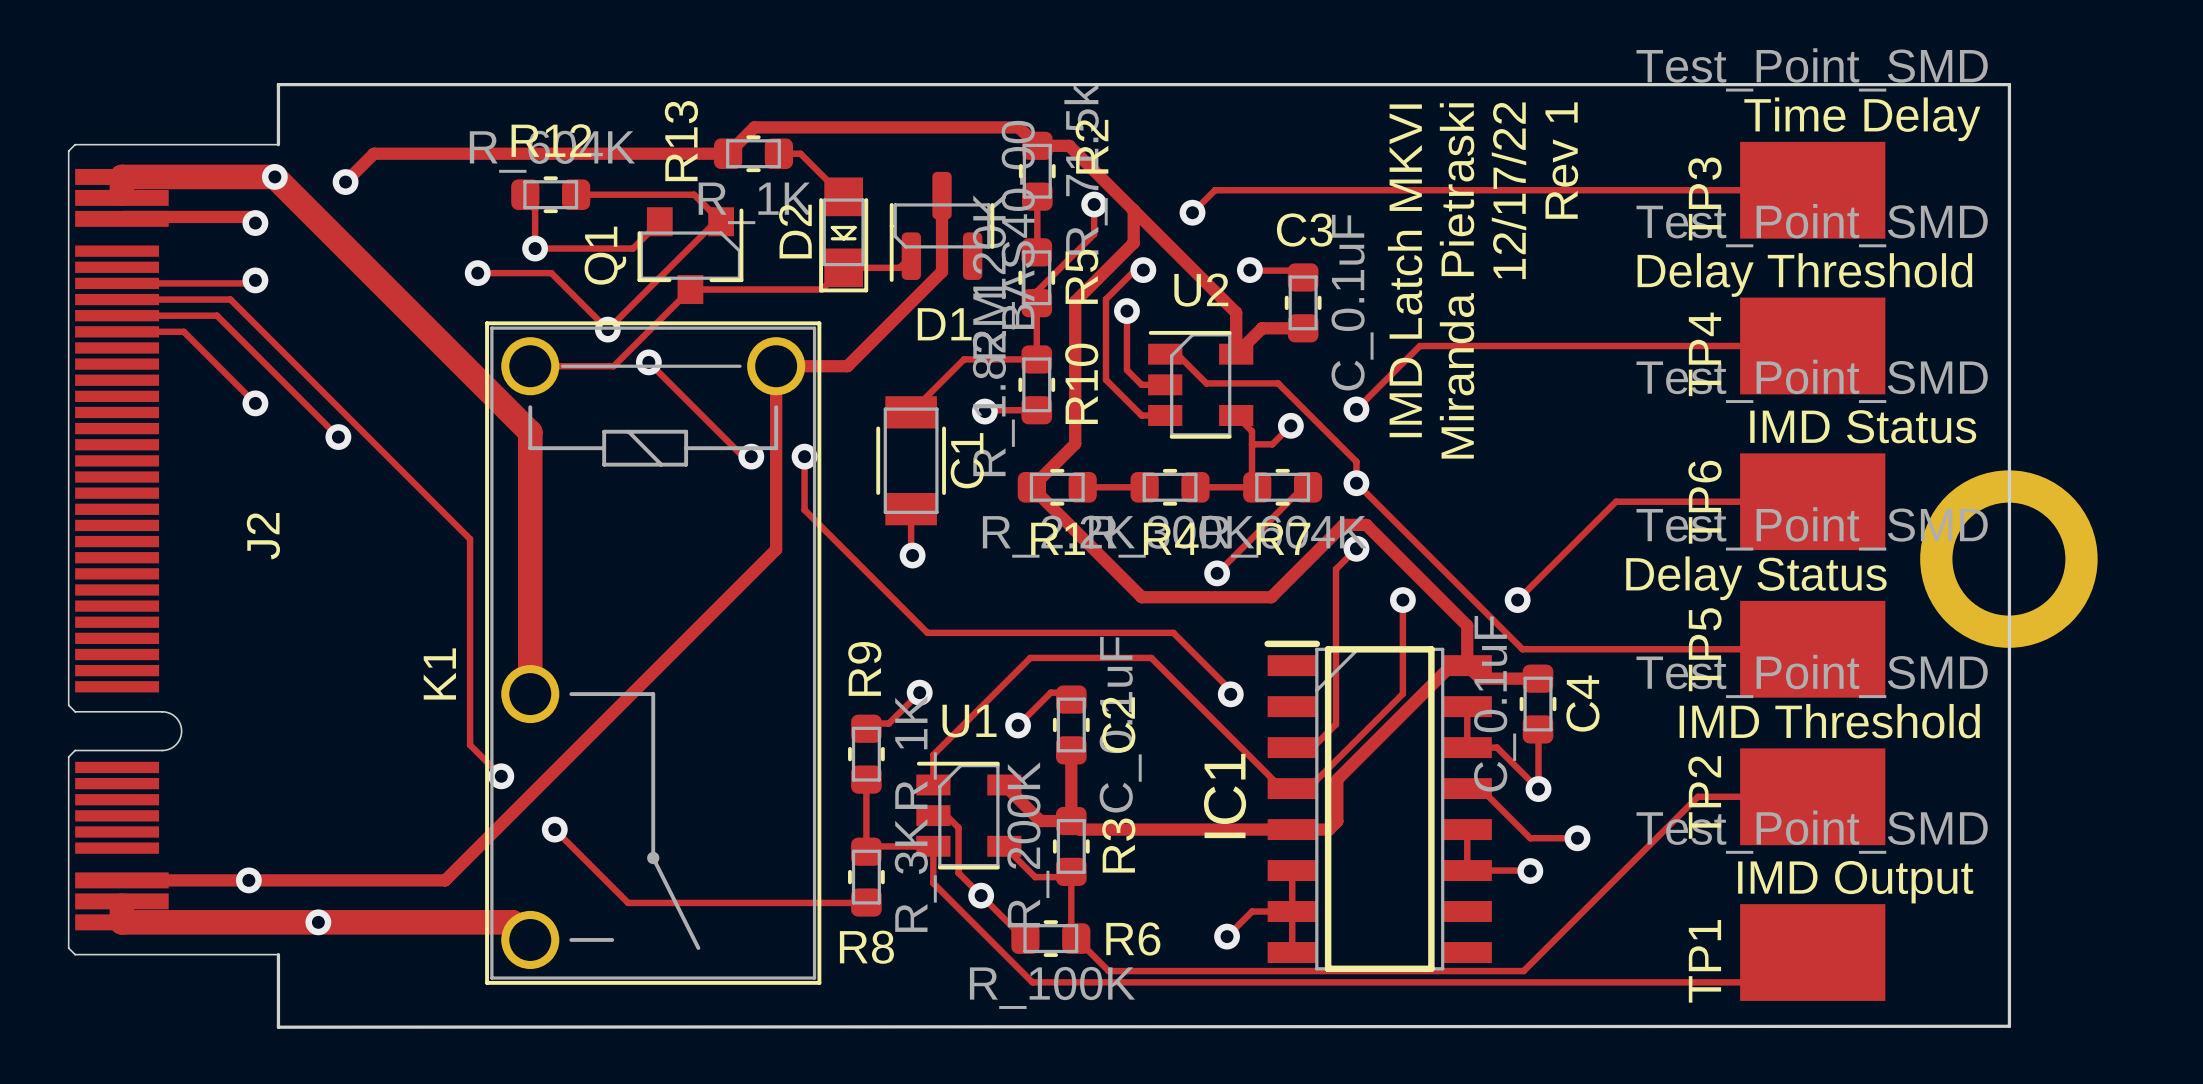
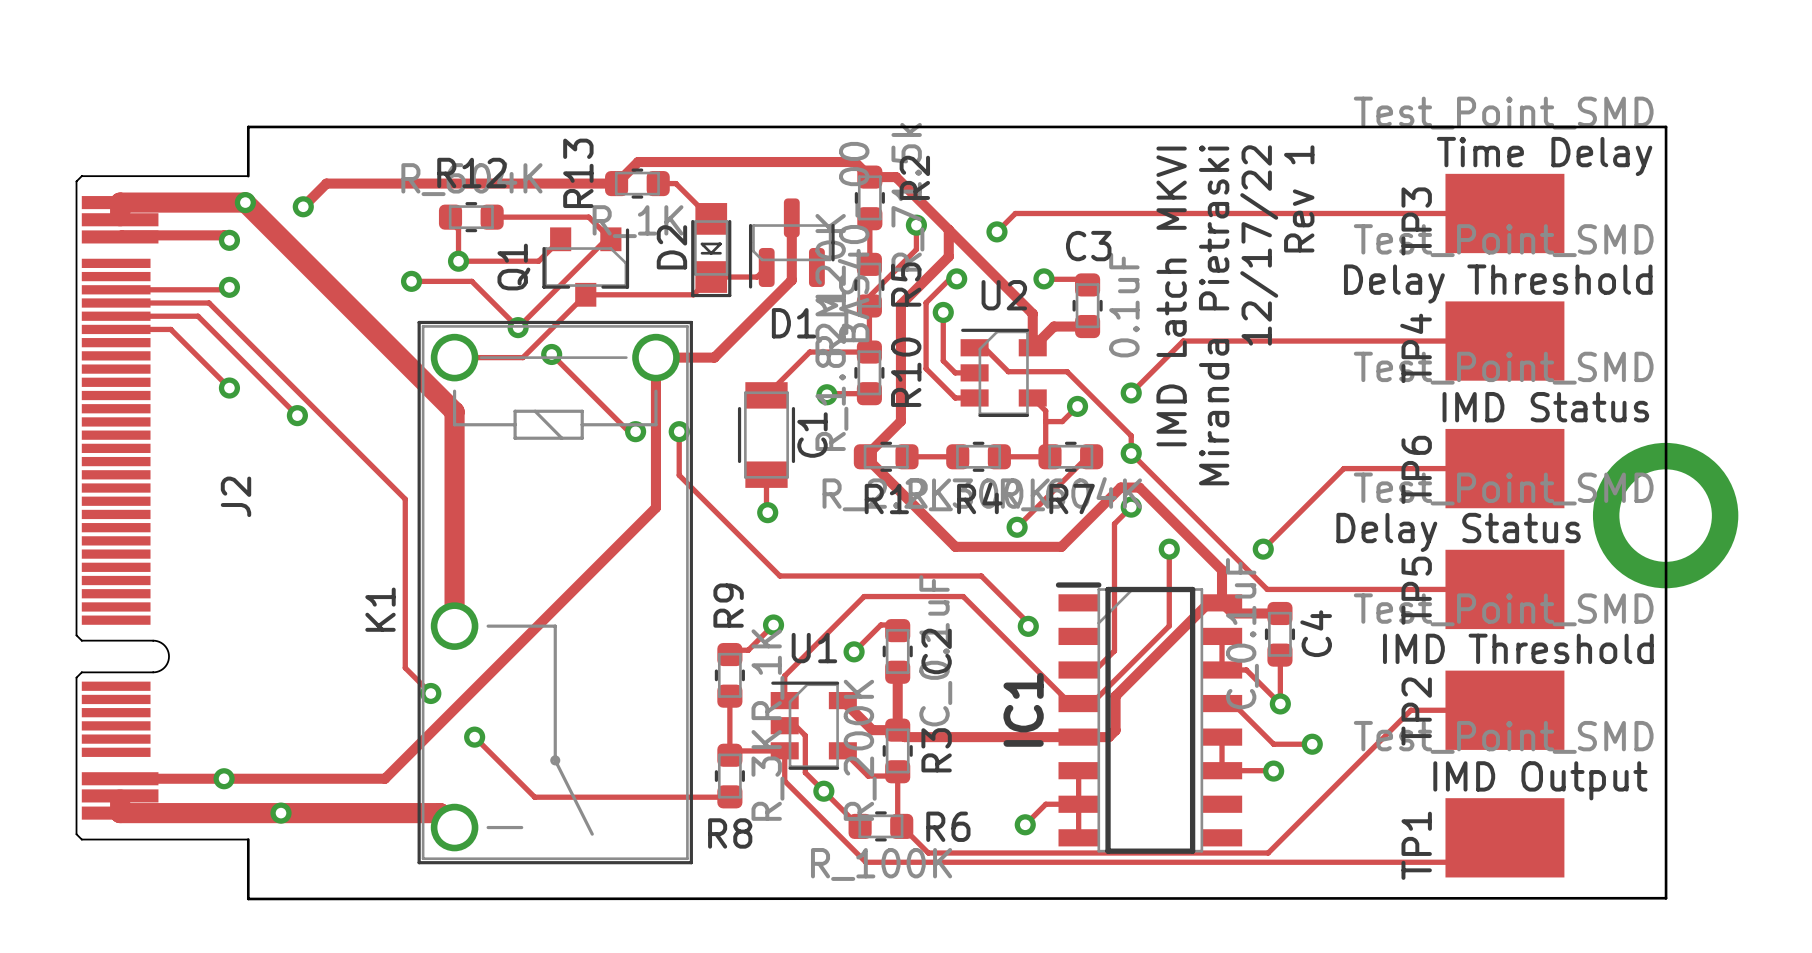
C3 value: C_0.1uF (1352, 302) -> 0.1uF (1124, 305)

